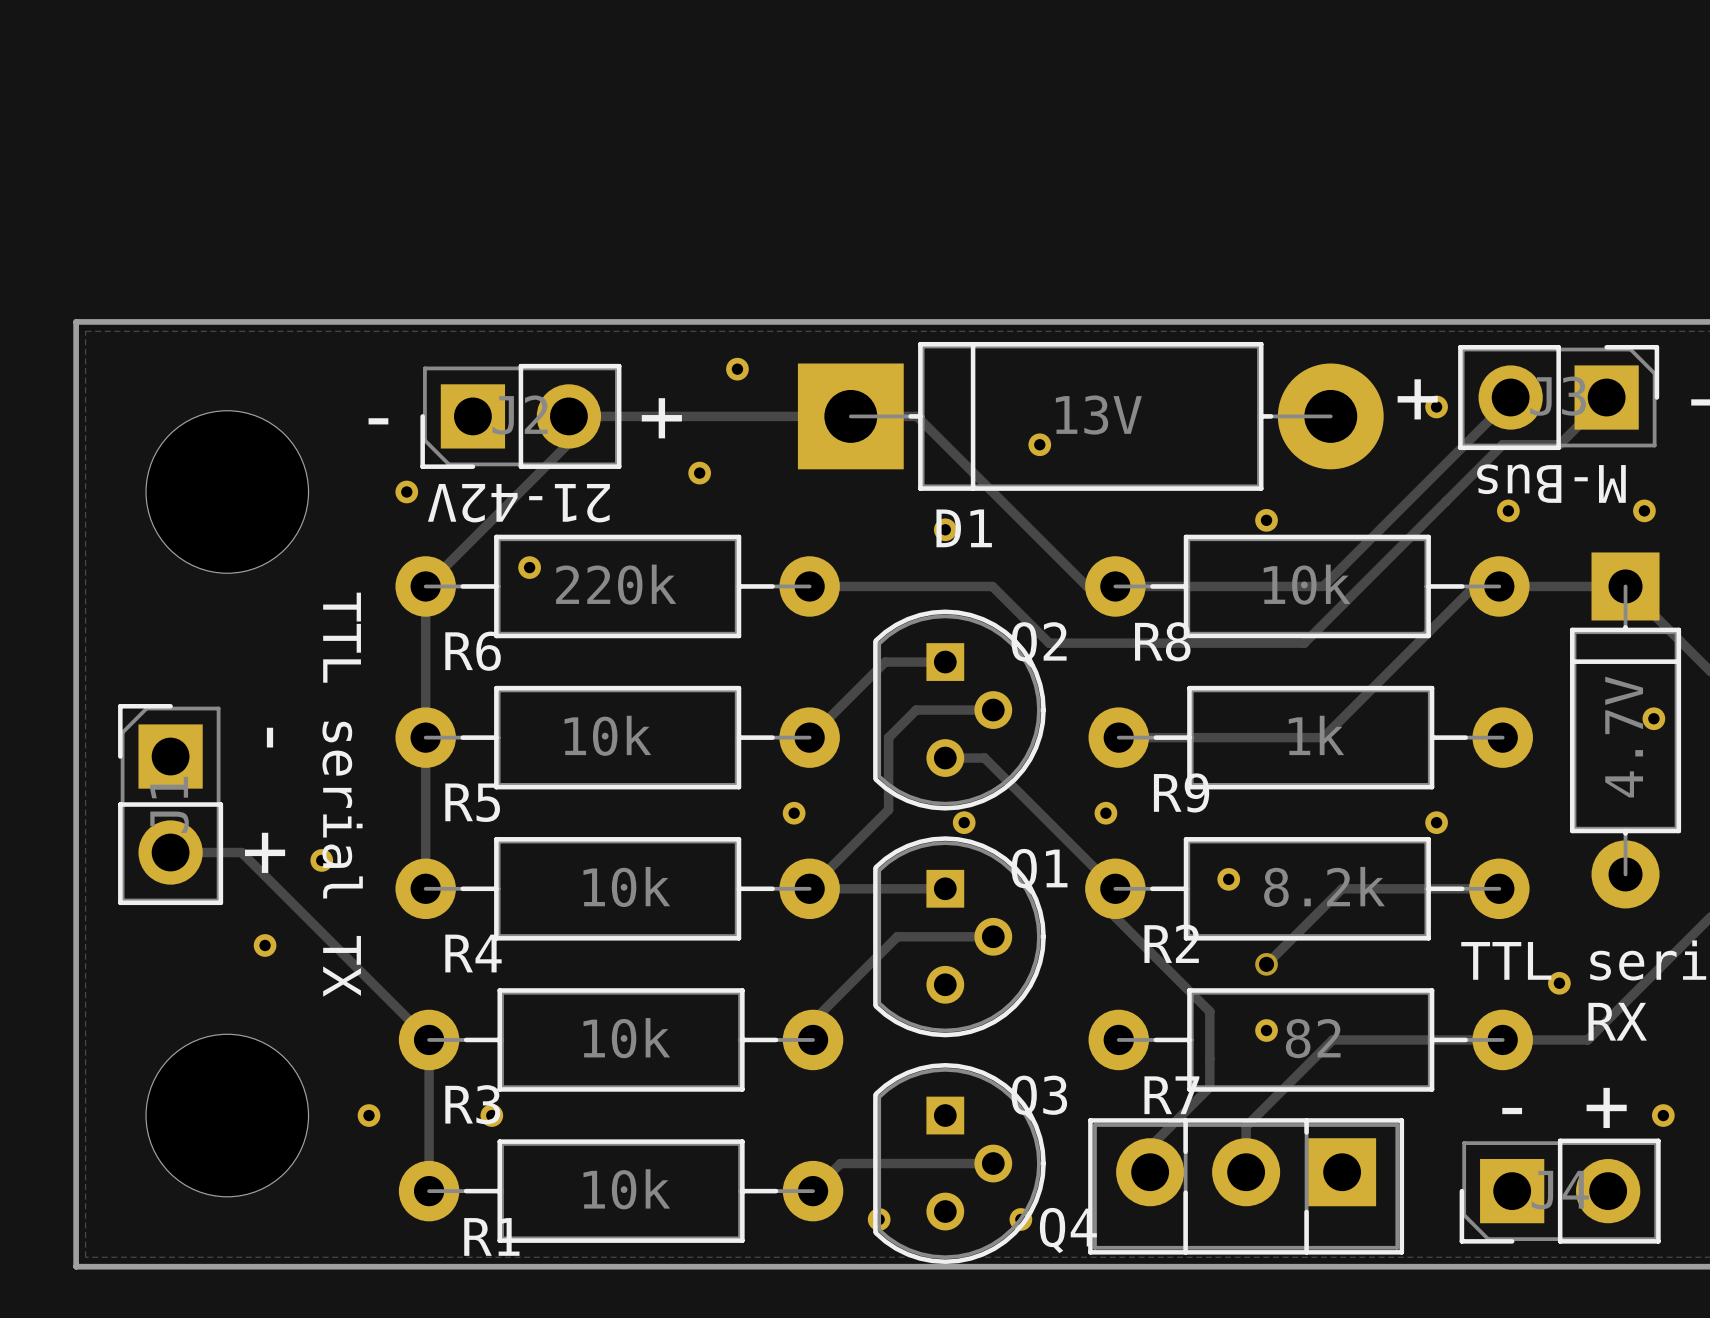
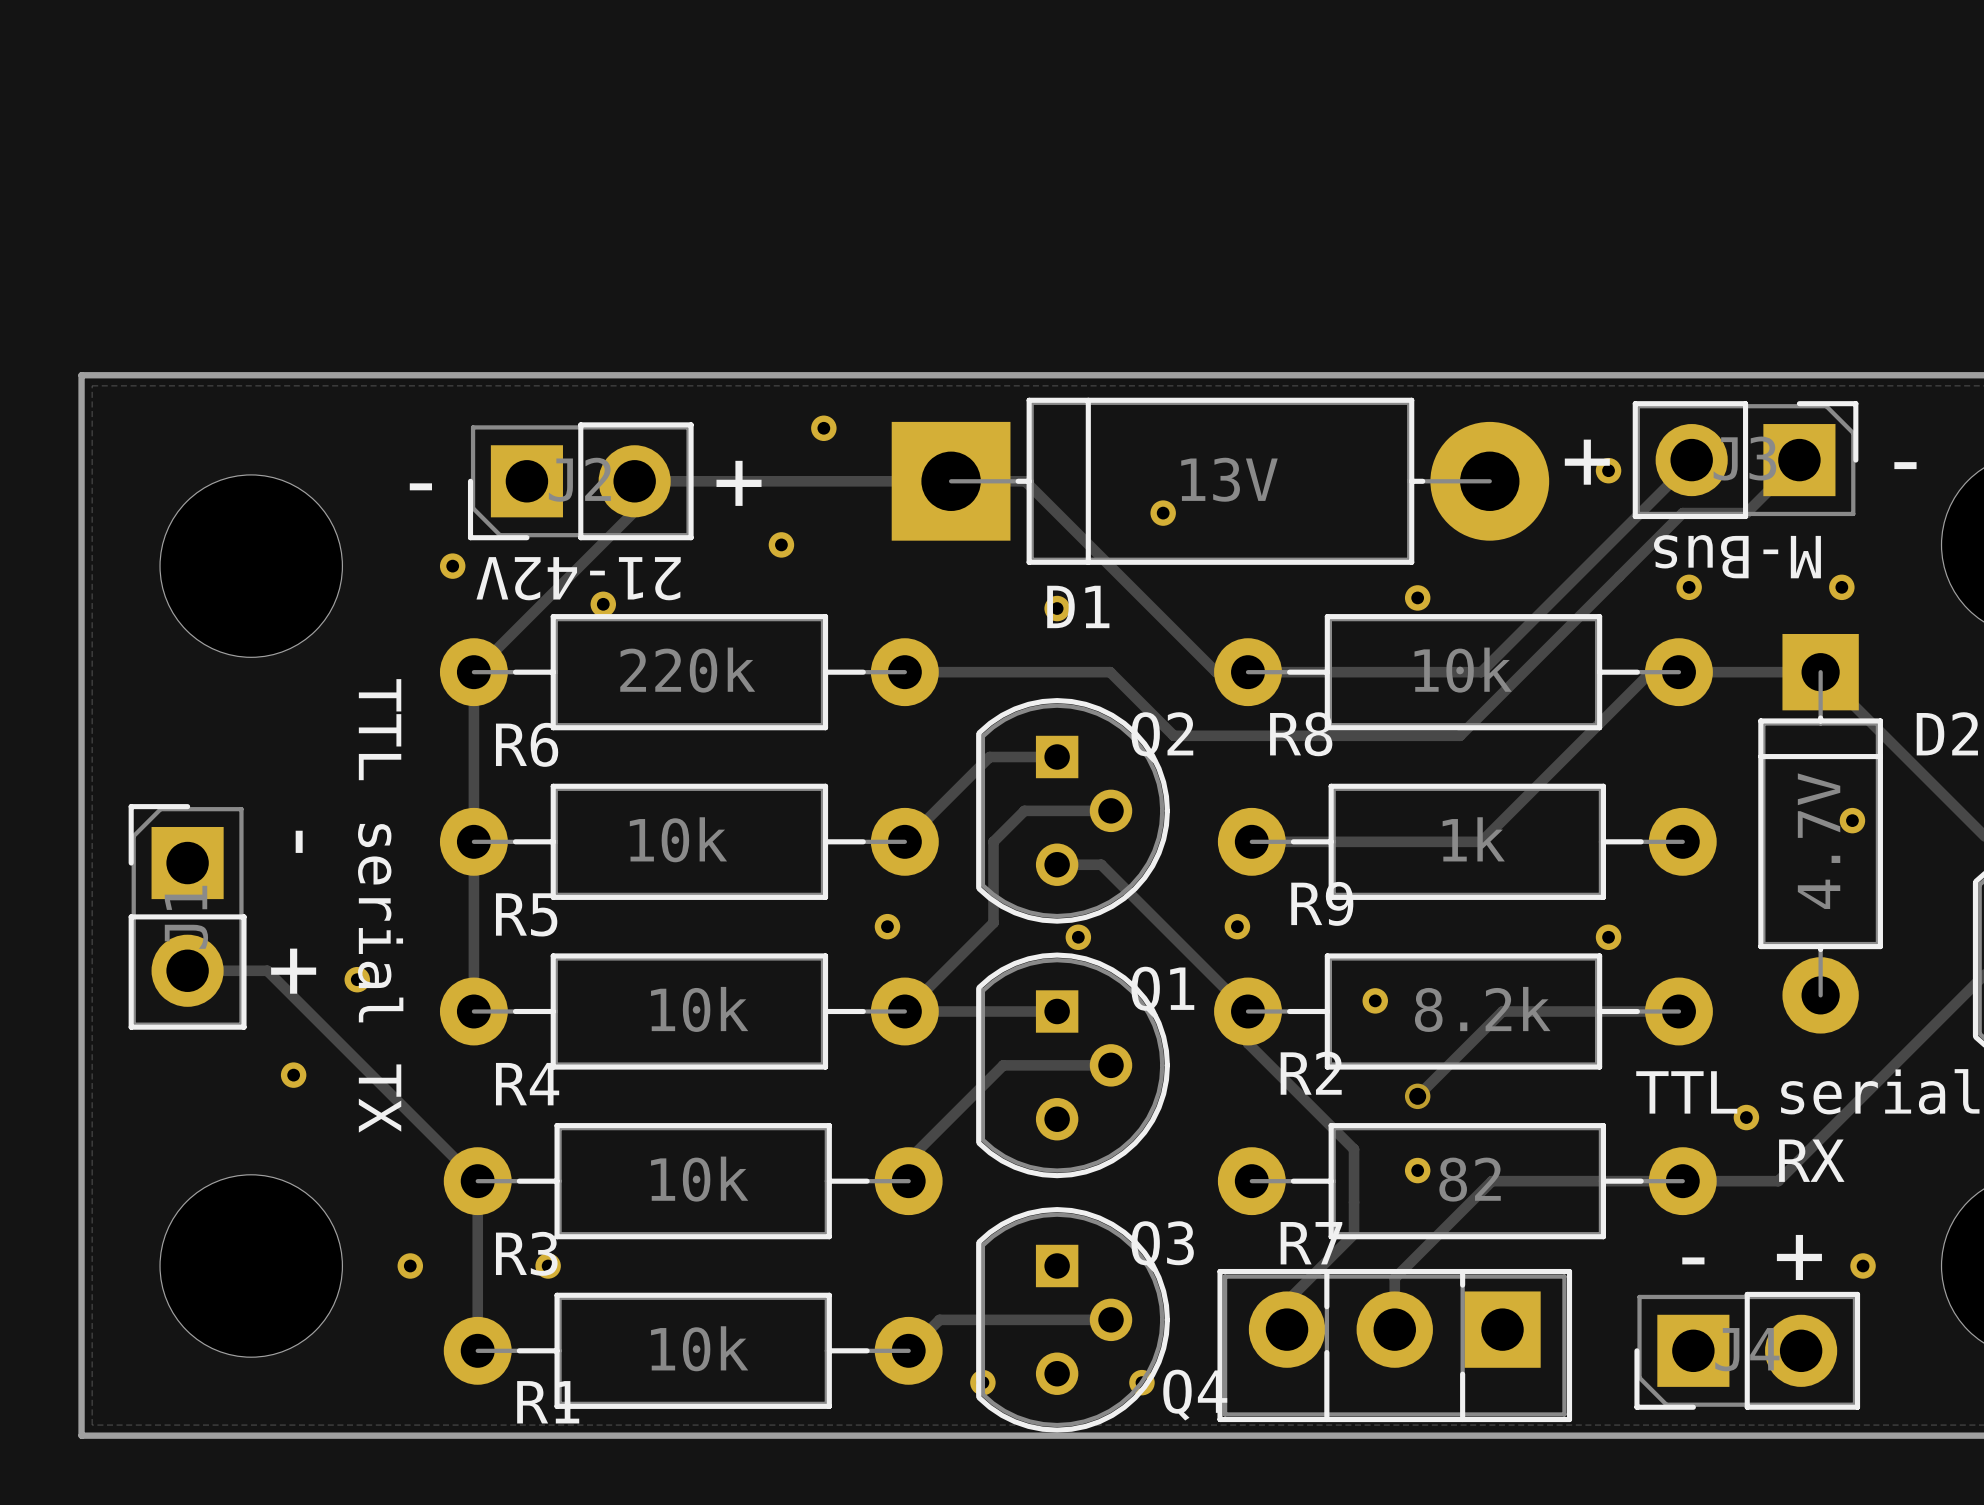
part position: (529, 567) -> (603, 604)

